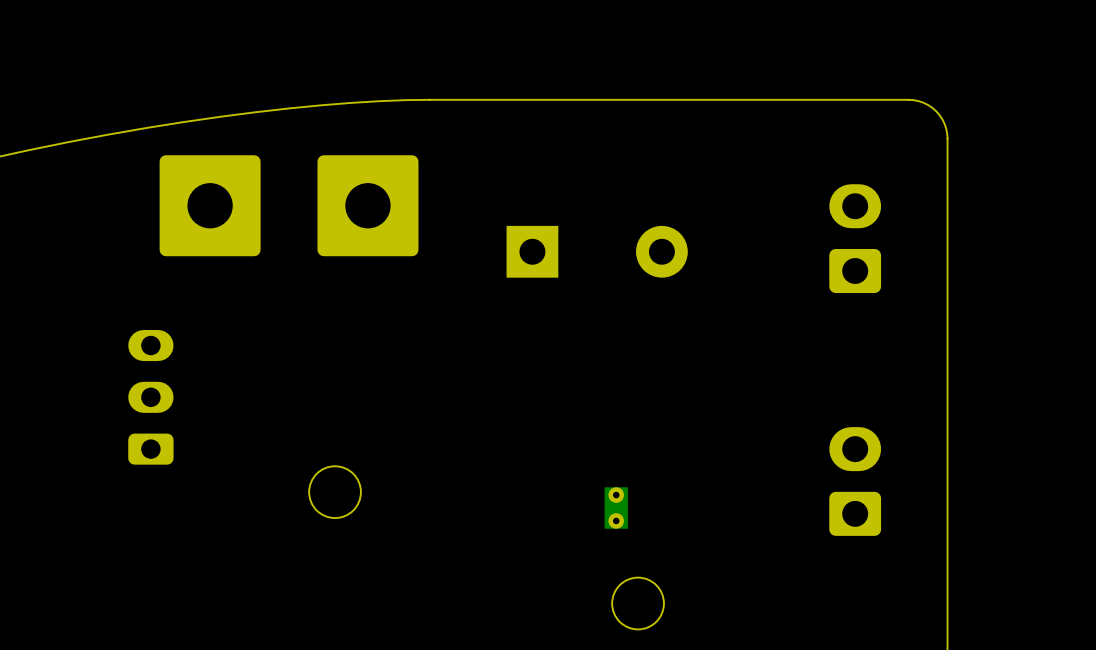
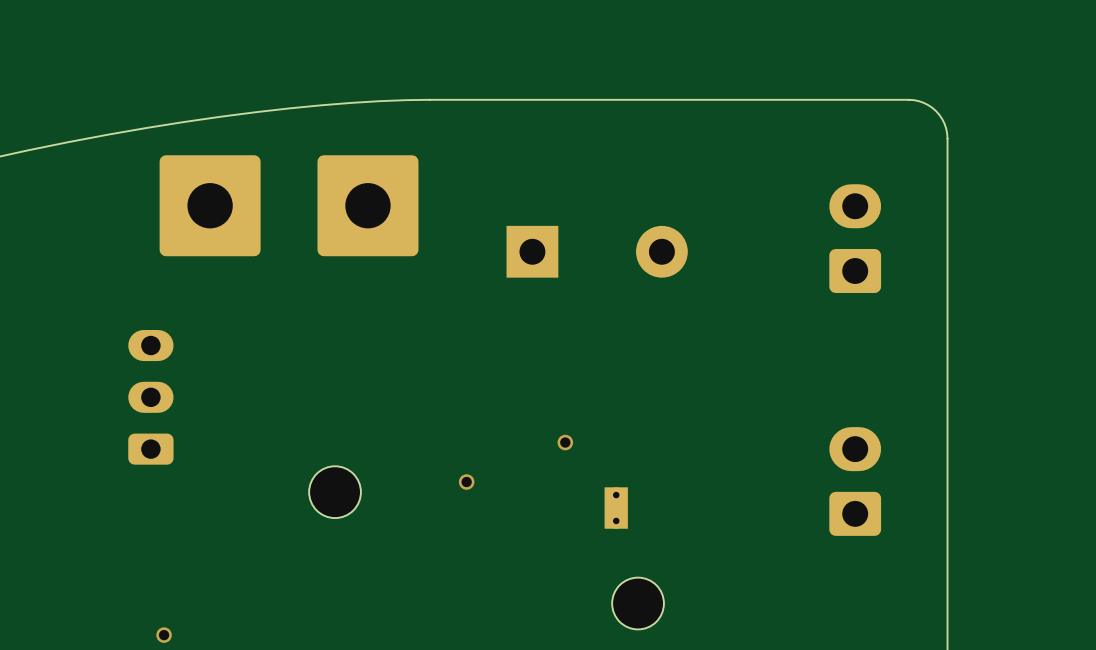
via: none -> (565, 442)
via: none -> (466, 482)
via: none -> (164, 635)

